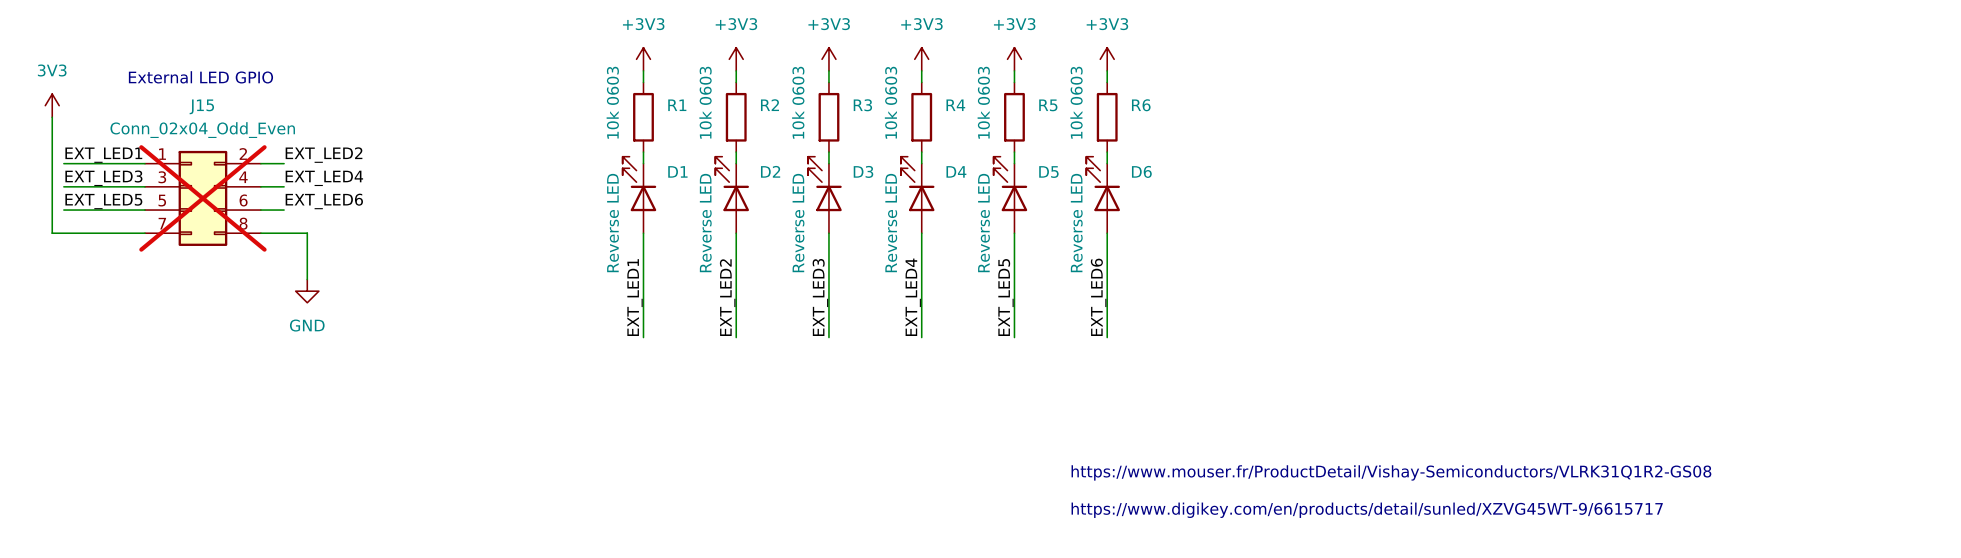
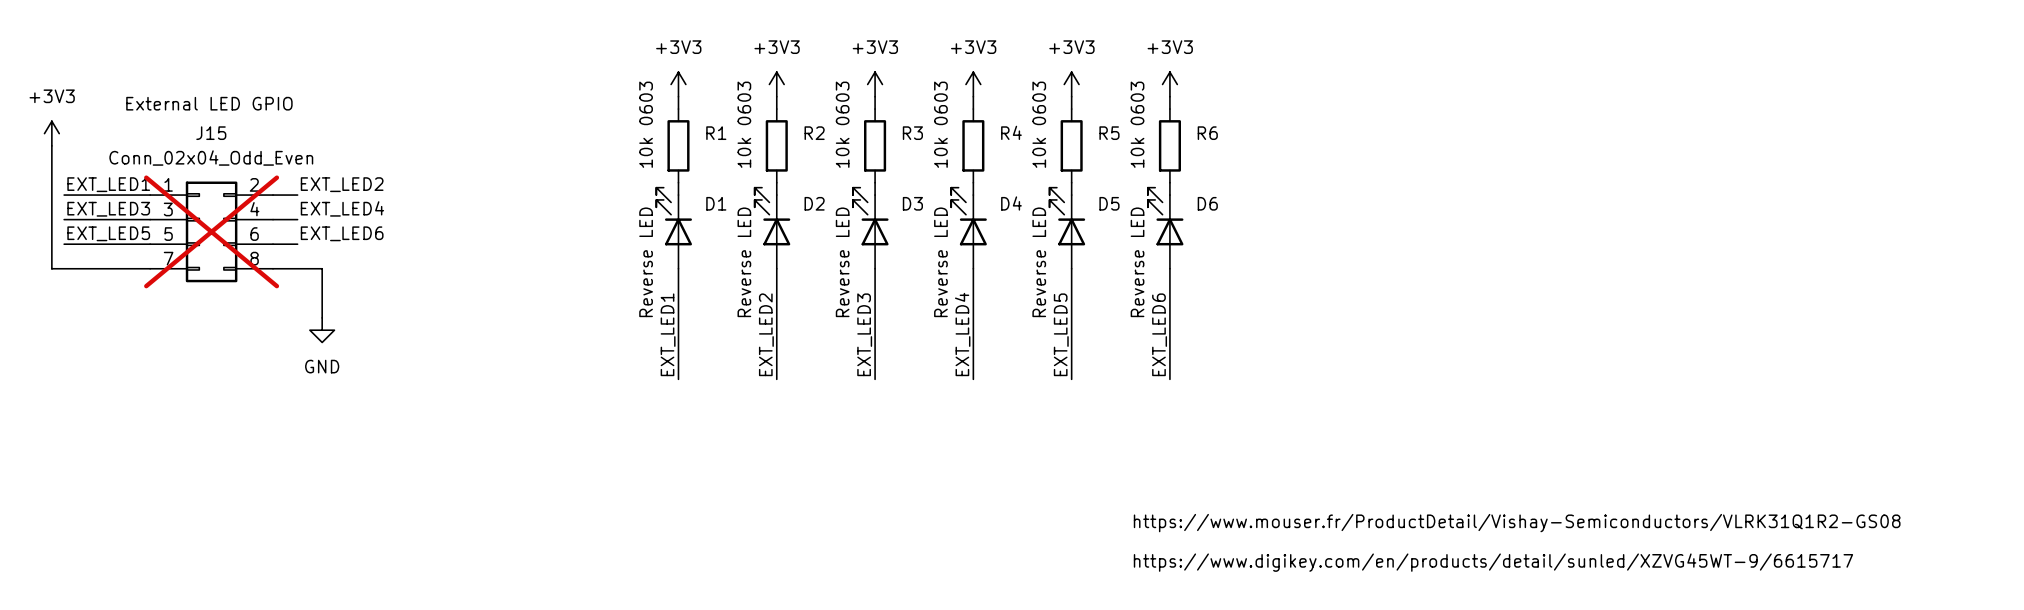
power symbol: 3V3 (52, 105) -> +3V3 (51, 133)

